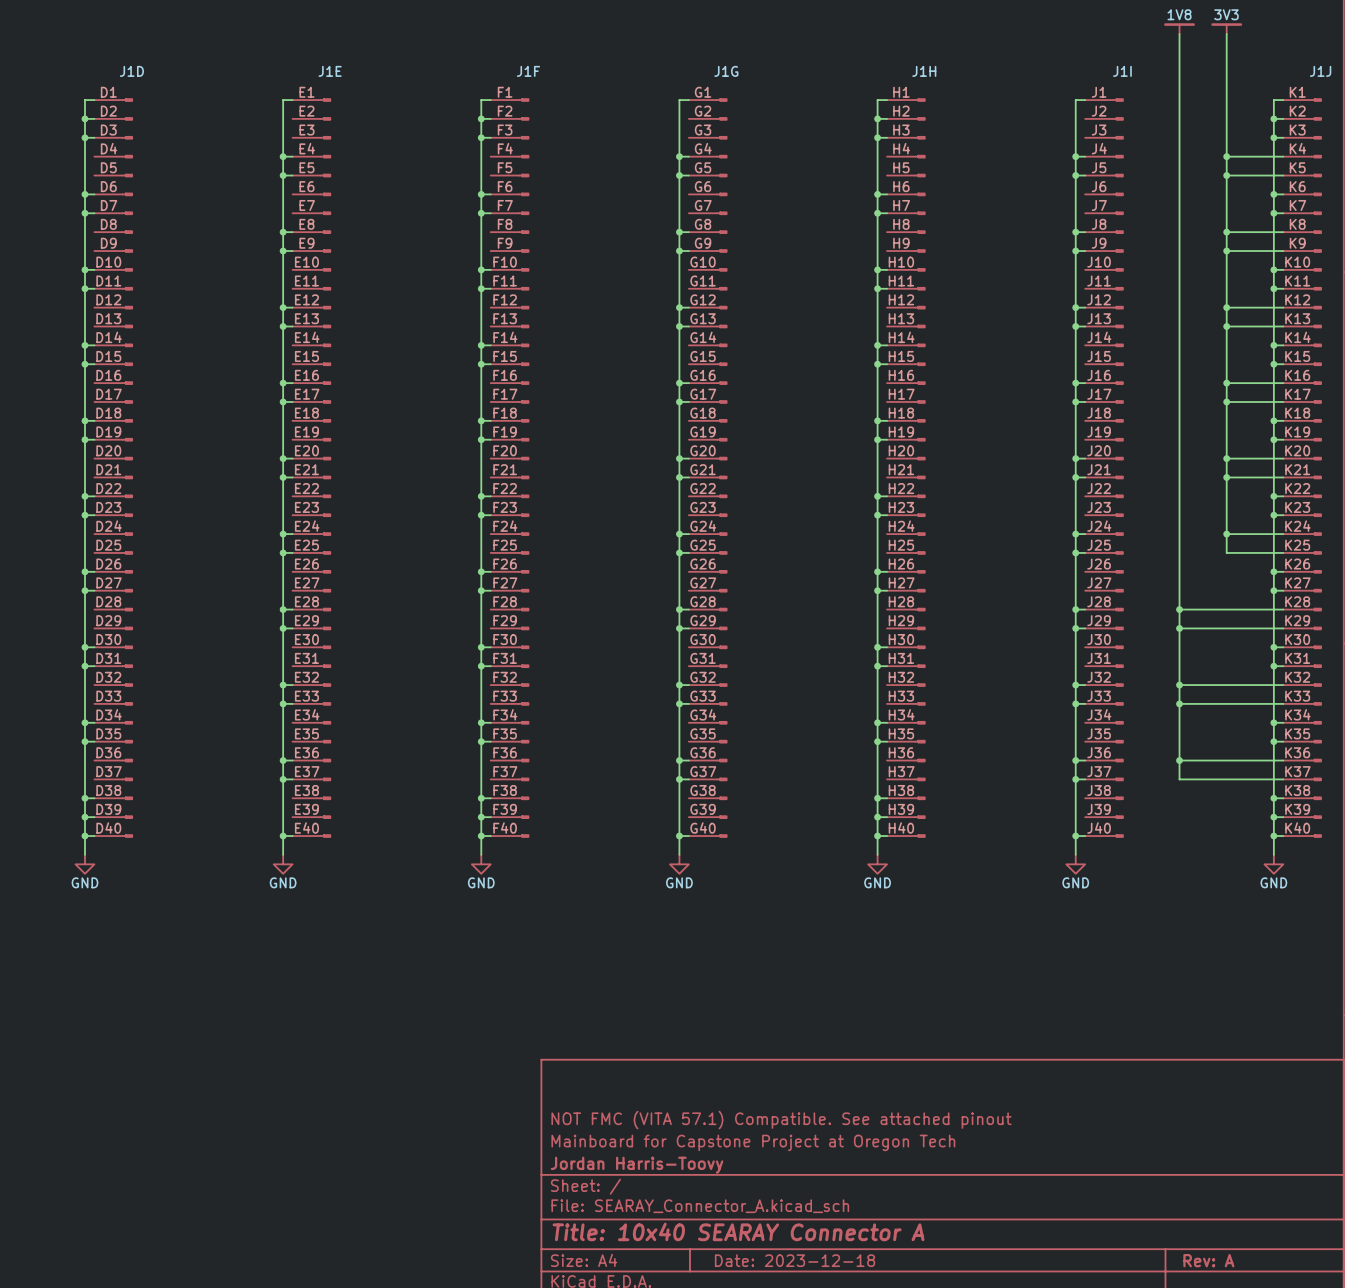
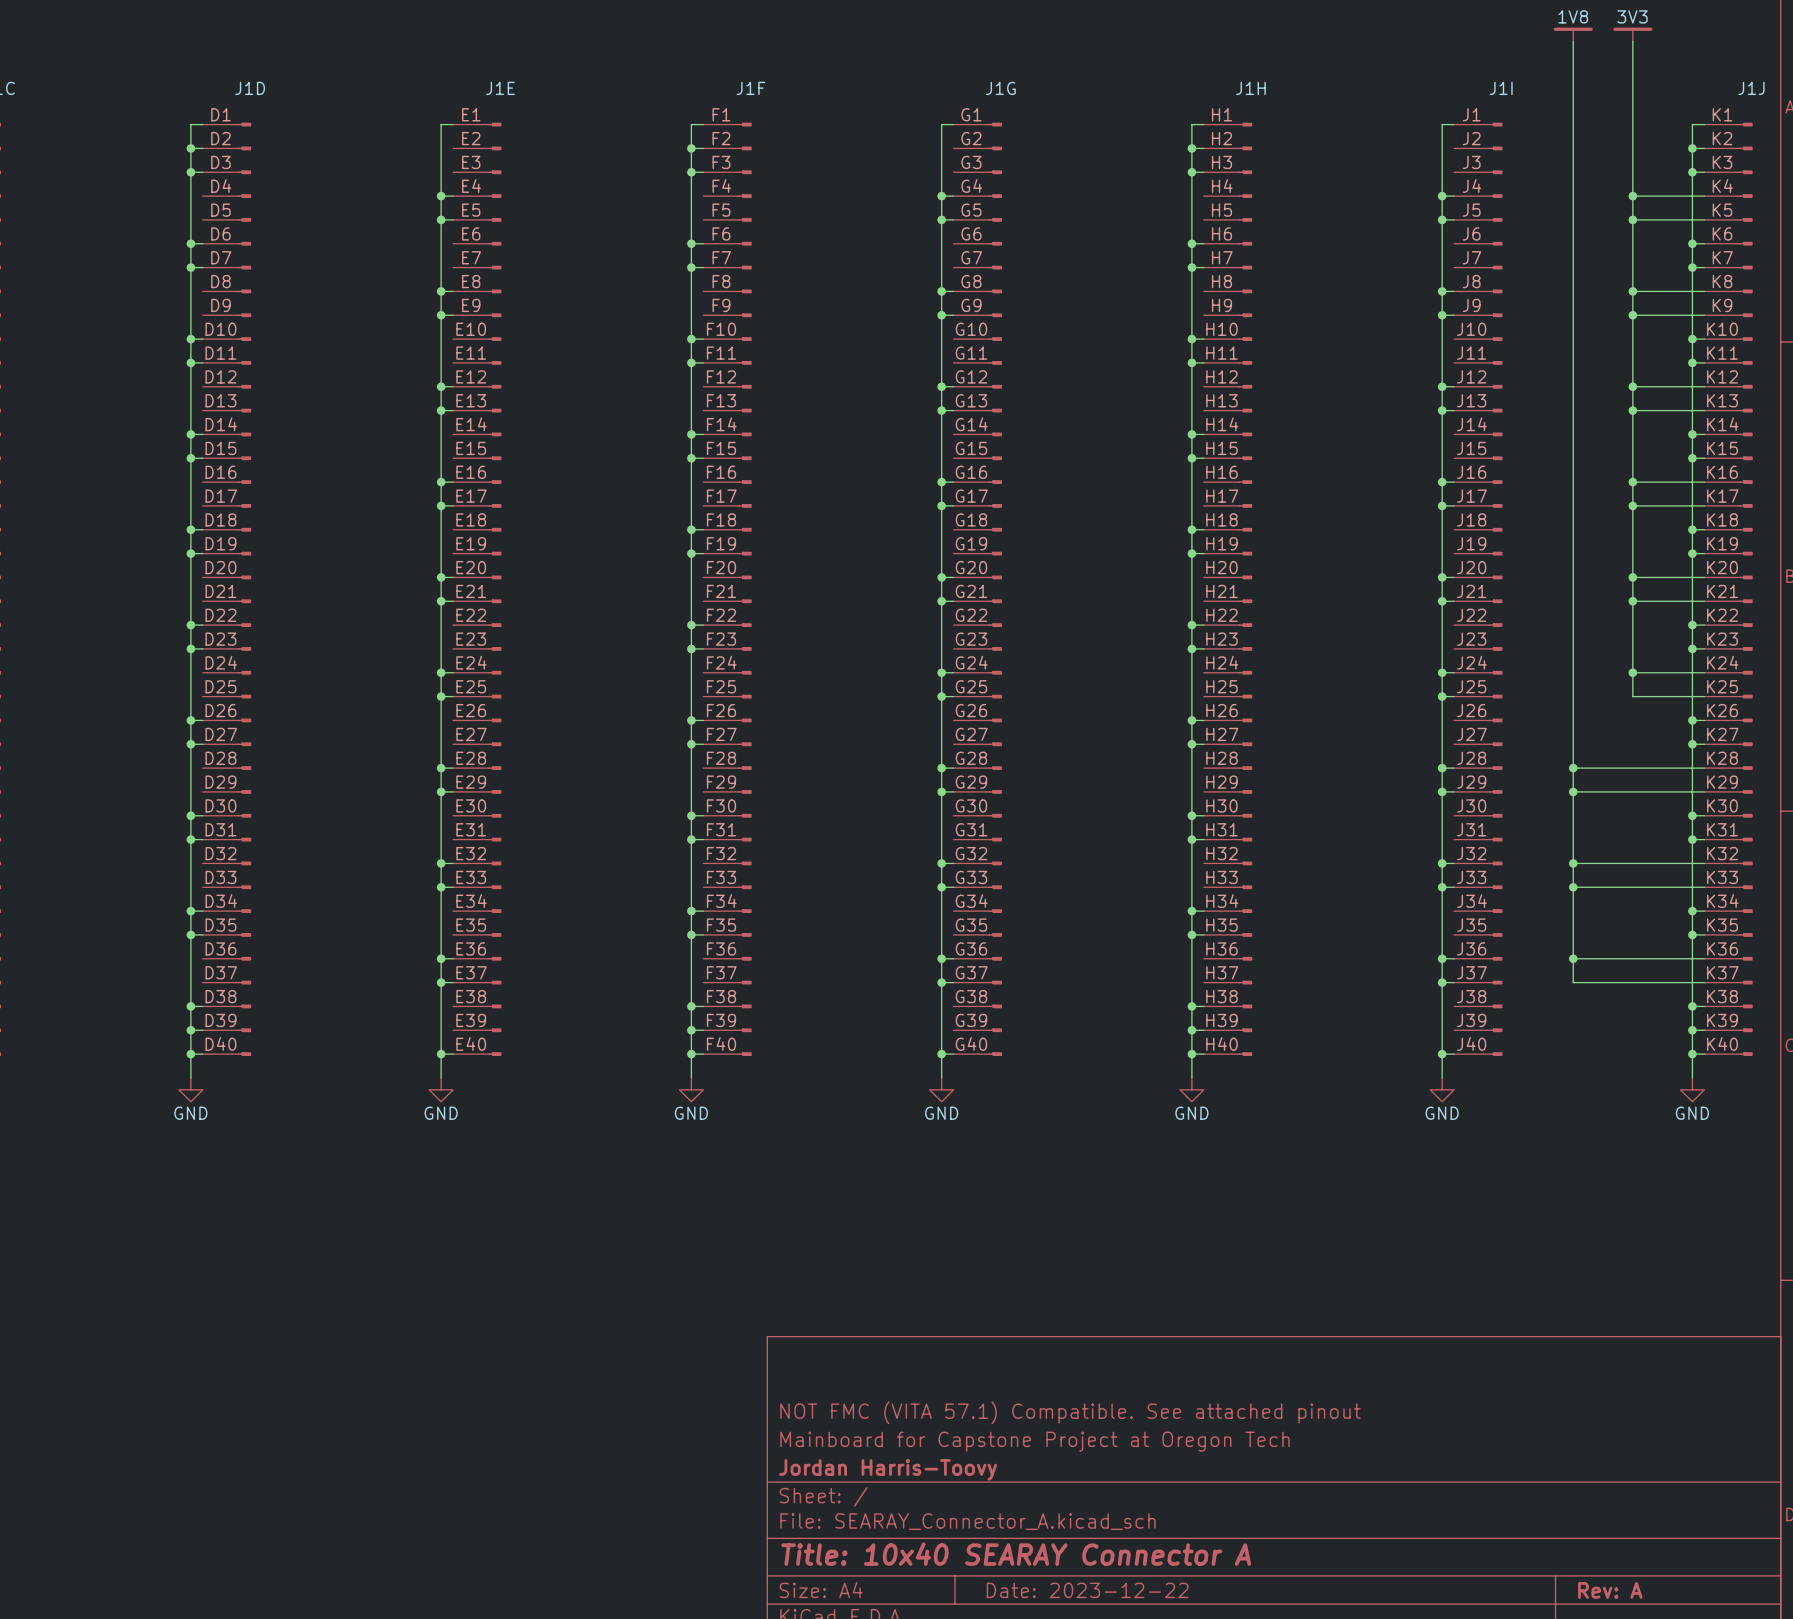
title block: Date: 2023-12-18 (795, 1260) -> Date: 2023-12-22 (1087, 1590)

